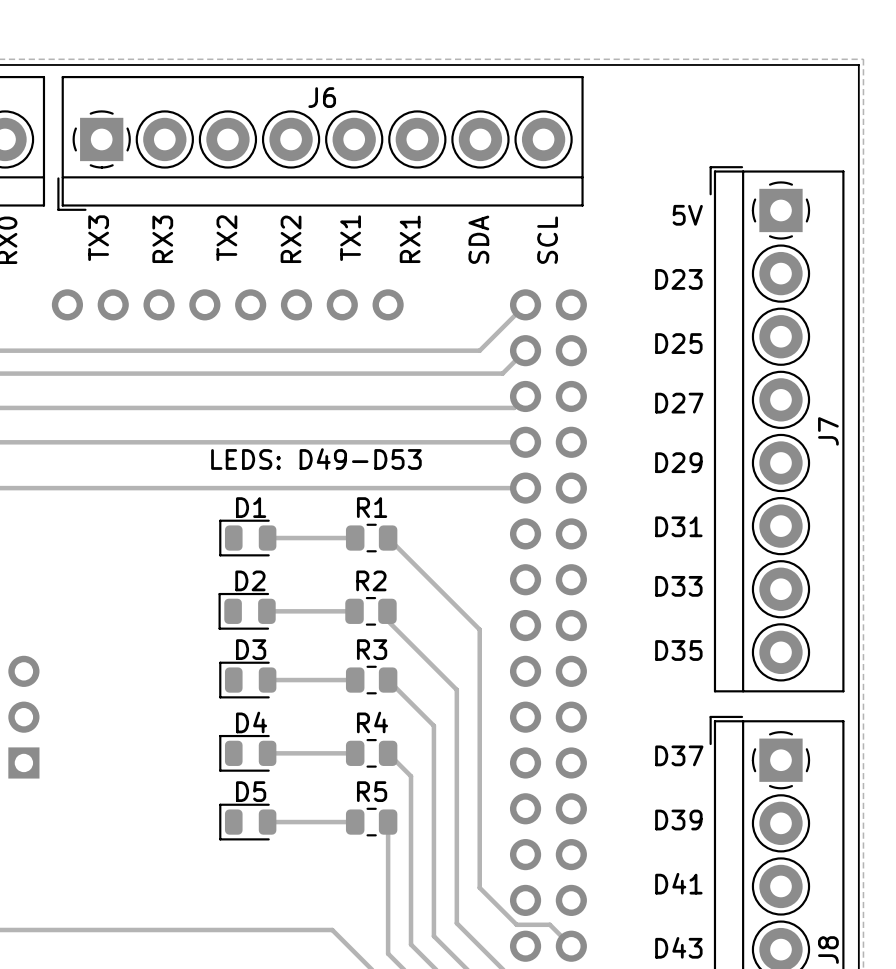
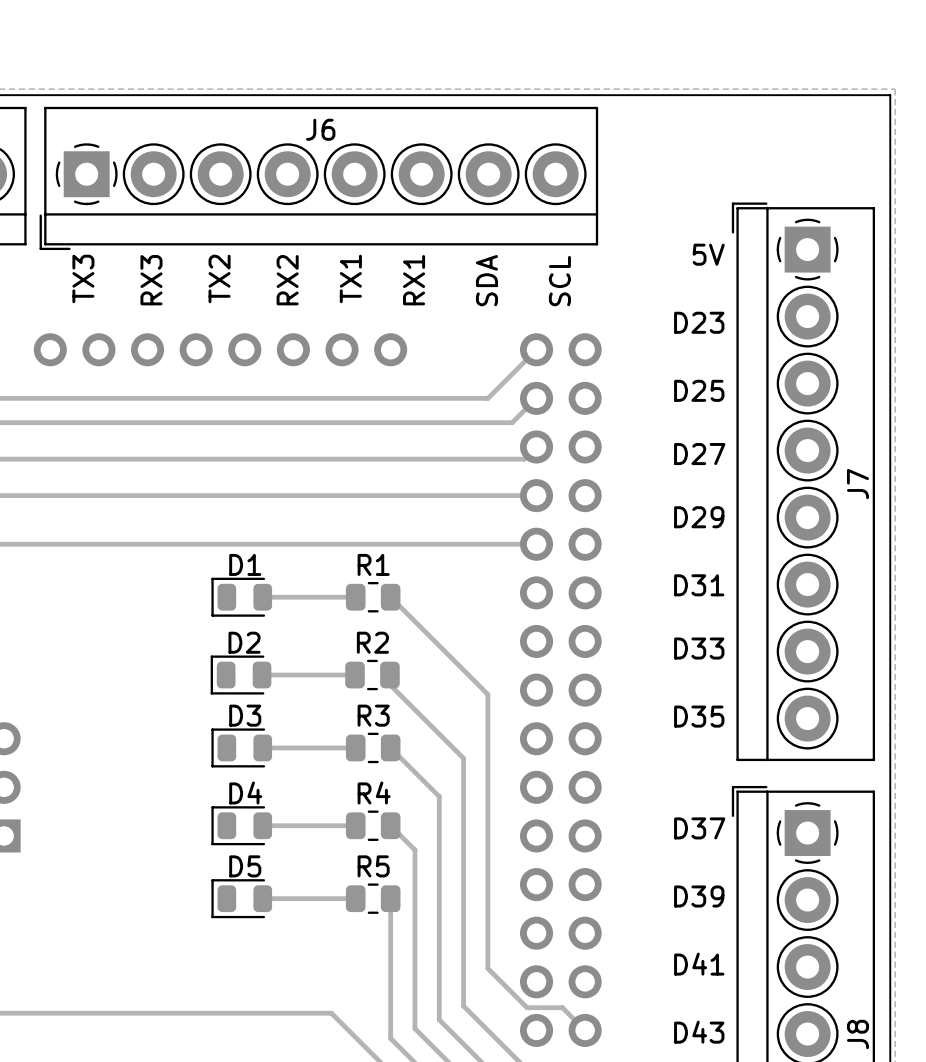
text: LEDS: D49-D53 (316, 459) -> none

